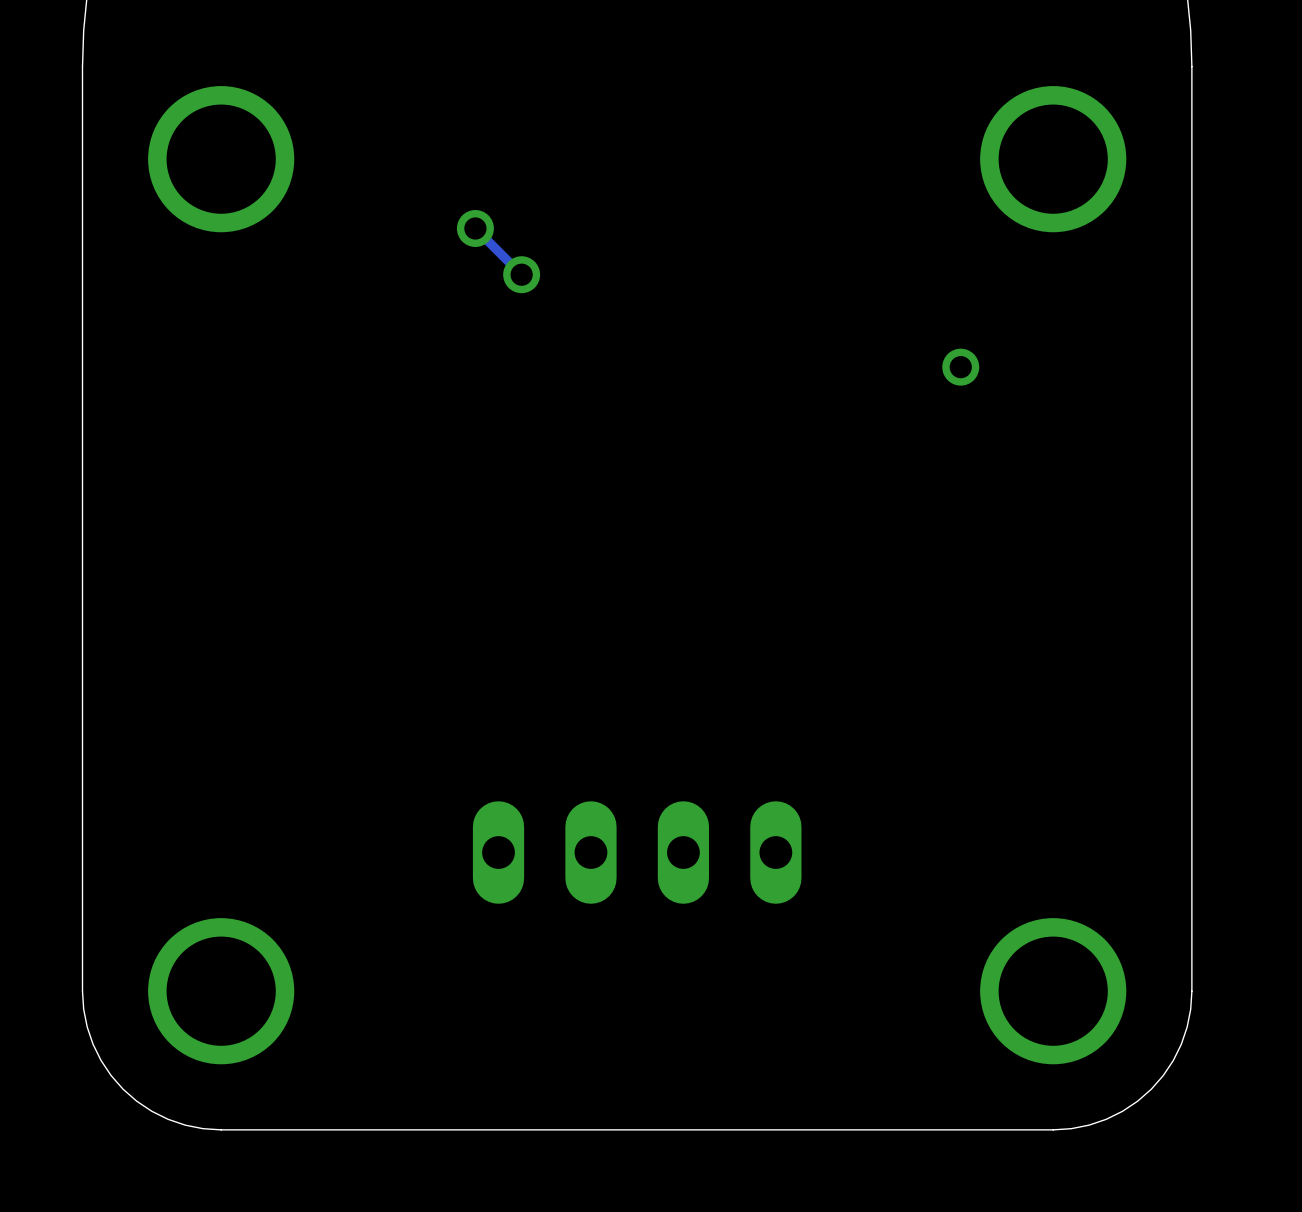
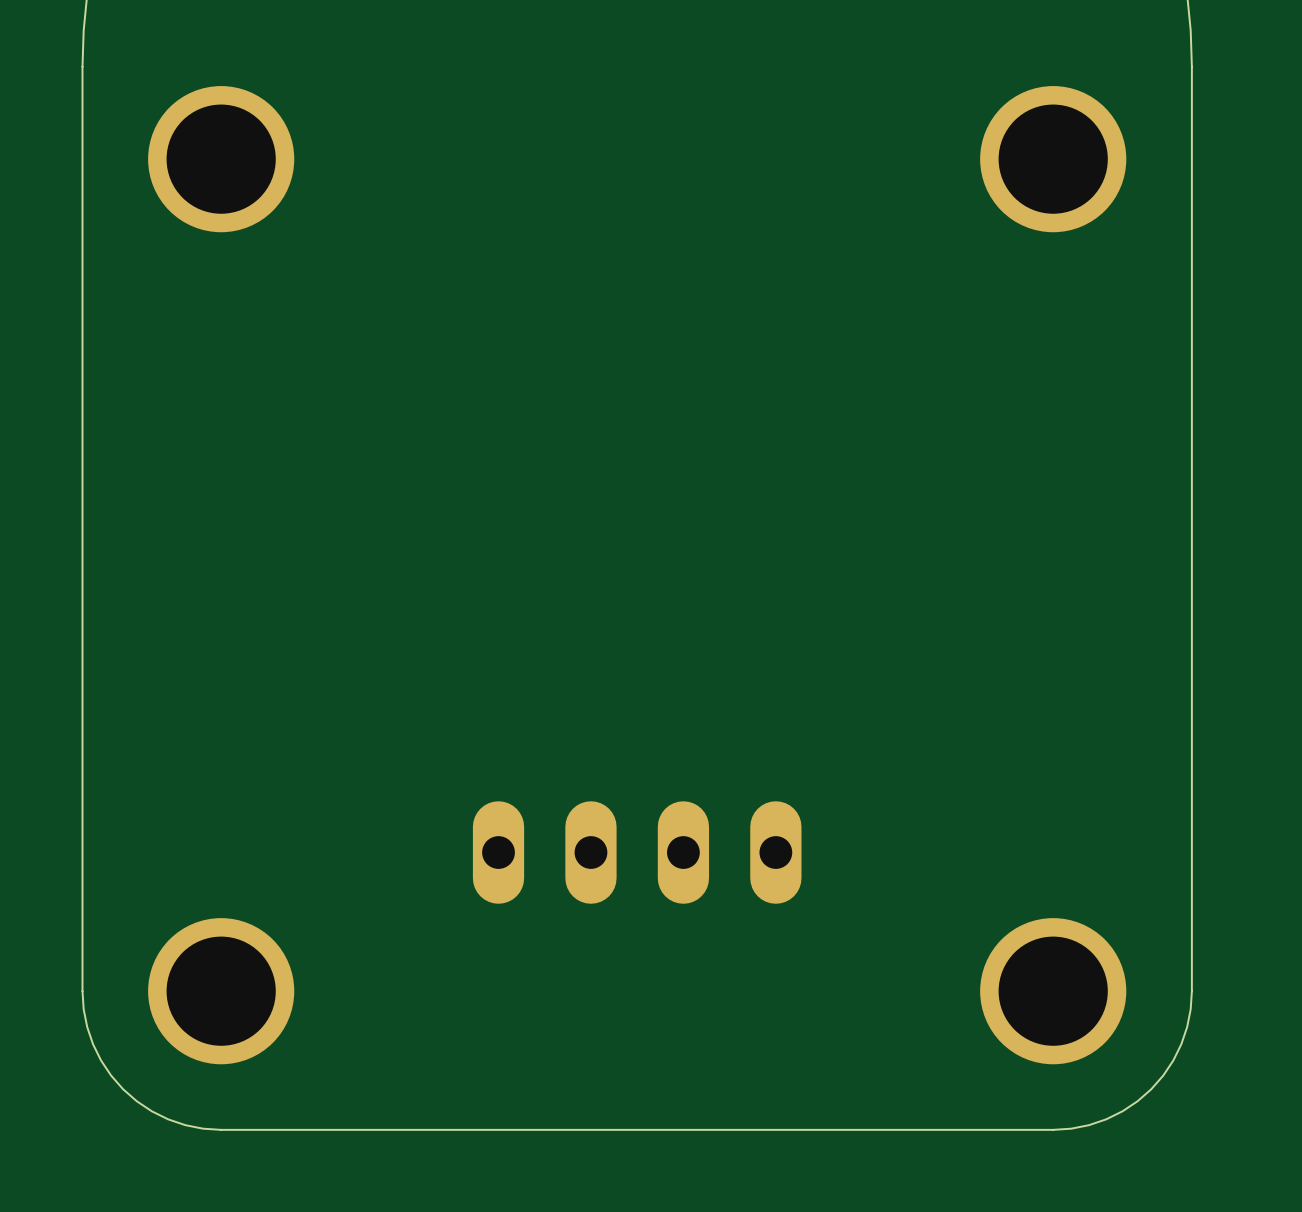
track: (475, 228) (521, 274) -> none
via: (475, 228) -> none
via: (521, 274) -> none
via: (960, 367) -> none

